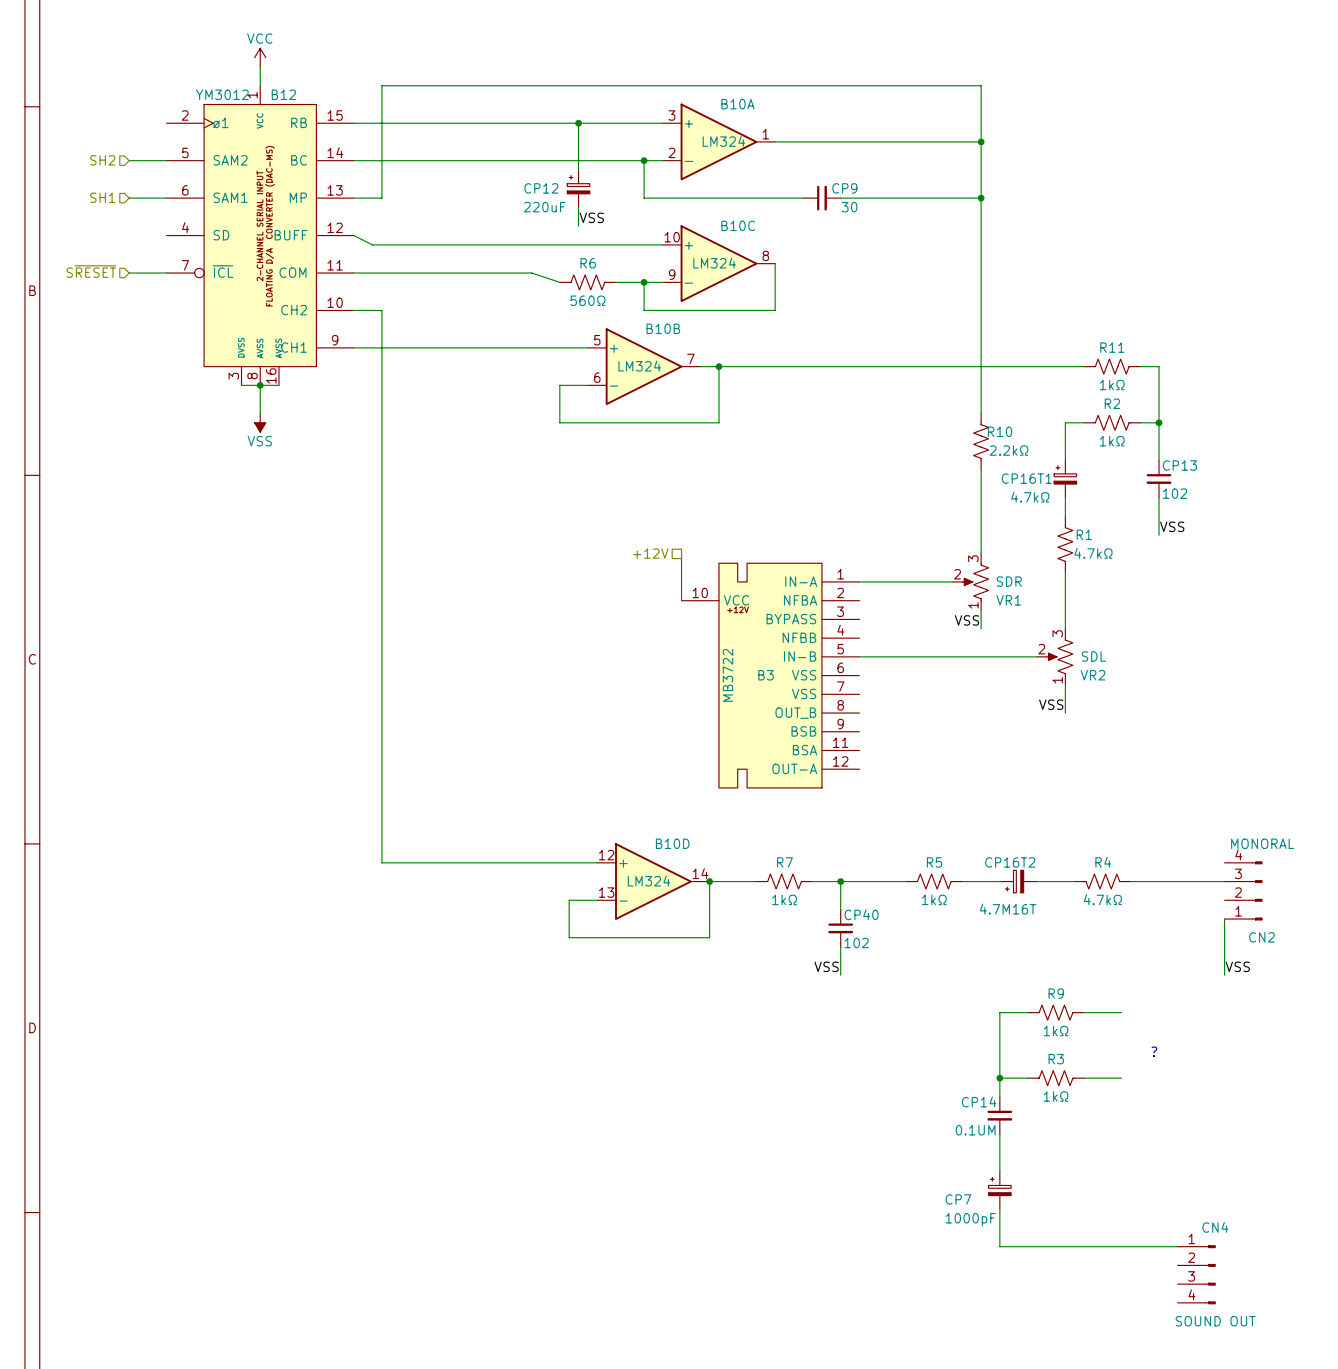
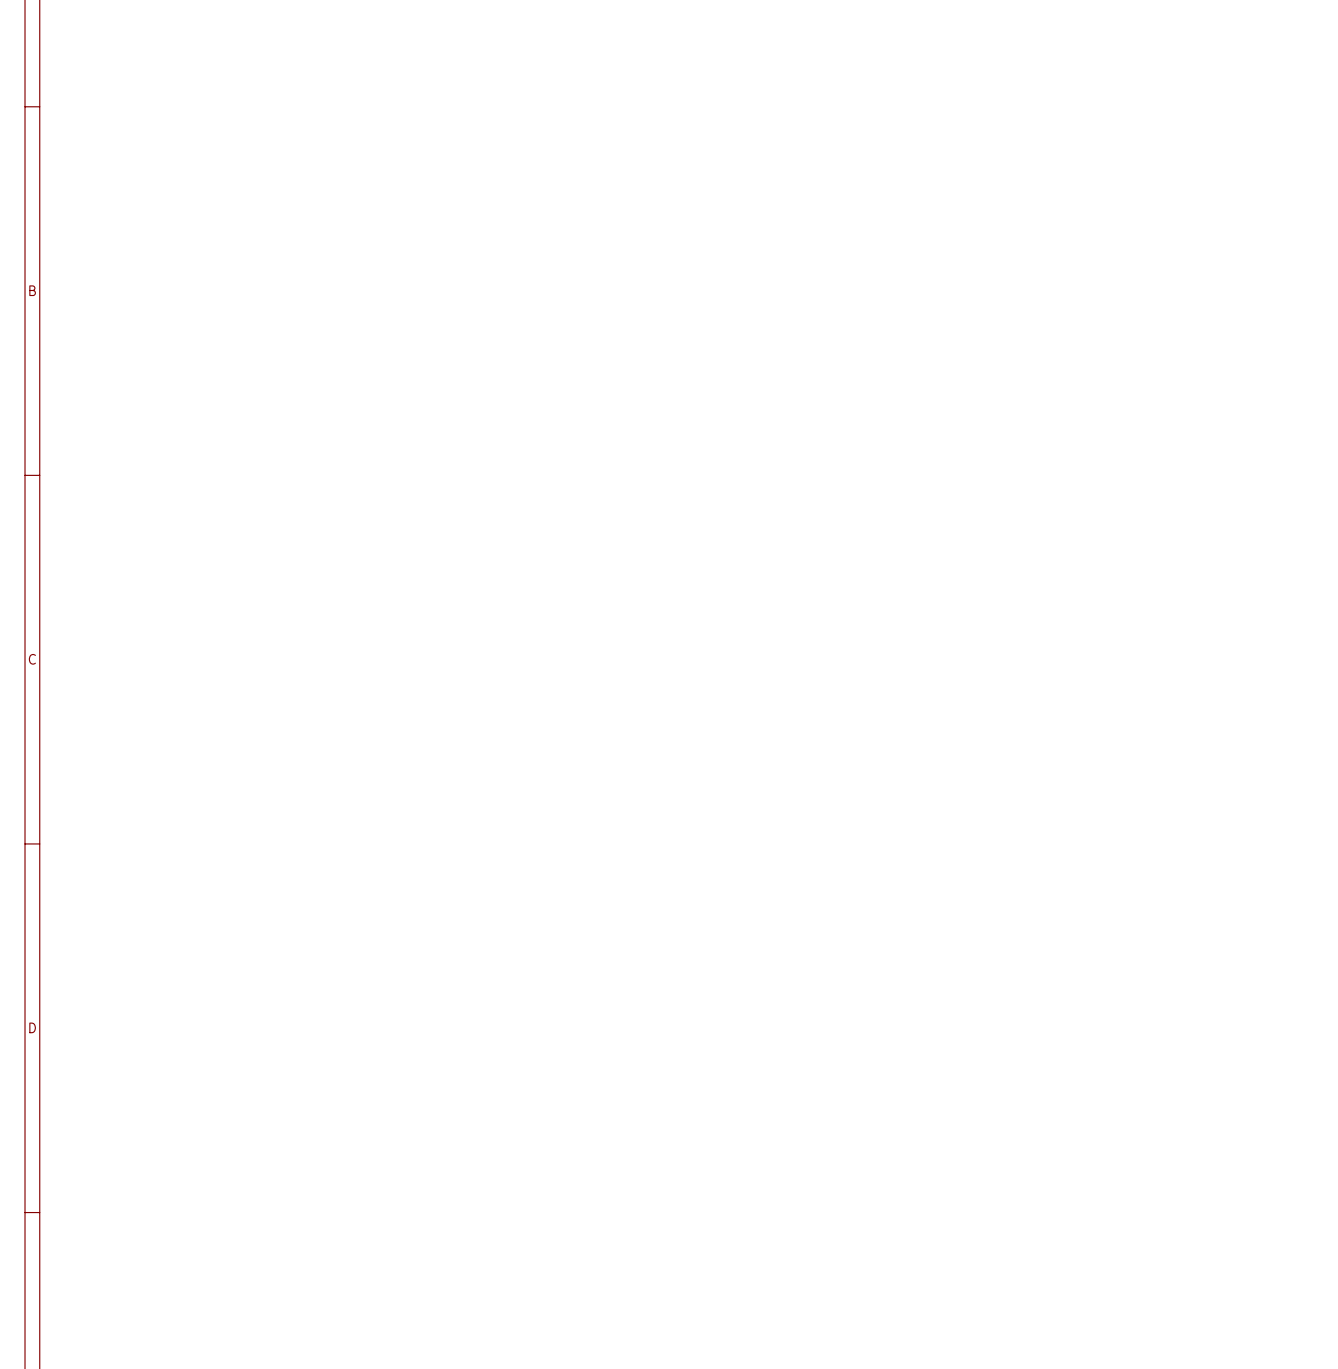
power symbol: VCC (260, 57) -> none
wire: (260, 67) (260, 85) -> none
wire: (353, 123) (662, 123) -> none
wire: (578, 123) (578, 170) -> none
junction: (578, 123) -> none
B10A: LM324 (718, 141) -> none
wire: (775, 141) (981, 141) -> none
junction: (981, 141) -> none
hierarchical label: SH2 (102, 160) -> none
wire: (129, 160) (166, 160) -> none
wire: (353, 160) (662, 160) -> none
wire: (644, 160) (644, 198) (803, 198) -> none
junction: (644, 160) -> none
CP12: 220uF (578, 188) -> none
hierarchical label: SH1 (102, 197) -> none
wire: (129, 198) (166, 198) -> none
wire: (353, 198) (381, 198) (381, 85) (981, 85) (981, 413) -> none
CP9: 30 (821, 198) -> none
wire: (840, 198) (981, 198) -> none
junction: (981, 198) -> none
wire: (578, 207) (578, 226) -> none
label: VSS (591, 217) -> none
B12: YM3012 (260, 235) -> none
wire: (353, 235) (372, 244) (662, 244) -> none
B10C: LM324 (718, 263) -> none
wire: (775, 263) (775, 310) (644, 310) (644, 282) -> none
hierarchical label: S~{RESET} (91, 271) -> none
wire: (129, 273) (166, 273) -> none
wire: (353, 273) (531, 273) (559, 282) -> none
R6: 560Ω (587, 282) -> none
wire: (616, 282) (662, 282) -> none
junction: (644, 282) -> none
wire: (353, 310) (381, 310) (381, 862) (597, 862) -> none
wire: (353, 347) (587, 347) -> none
B10B: LM324 (644, 366) -> none
wire: (700, 366) (1084, 366) -> none
wire: (718, 366) (718, 422) (559, 422) (559, 385) (587, 385) -> none
junction: (718, 366) -> none
R11: 1kΩ (1112, 366) -> none
wire: (1140, 366) (1159, 366) (1159, 460) -> none
wire: (241, 385) (278, 385) -> none
wire: (260, 385) (260, 413) -> none
junction: (260, 385) -> none
power symbol: VSS (260, 422) -> none
wire: (1084, 422) (1065, 422) (1065, 460) -> none
R2: 1kΩ (1112, 422) -> none
wire: (1140, 422) (1159, 422) -> none
junction: (1159, 422) -> none
R10: 2.2kΩ (981, 441) -> none
wire: (981, 469) (981, 553) -> none
CP16T1: 4.7kΩ (1065, 478) -> none
CP13: 102 (1159, 478) -> none
wire: (1065, 497) (1065, 516) -> none
wire: (1159, 497) (1159, 535) -> none
label: VSS (1172, 526) -> none
R1: 4.7kΩ (1065, 544) -> none
hierarchical label: +12V (650, 553) -> none
wire: (681, 553) (681, 600) -> none
wire: (1065, 572) (1065, 628) -> none
wire: (859, 581) (953, 581) -> none
SDR: VR1 (970, 581) -> none
wire: (981, 610) (981, 628) -> none
label: VSS (967, 620) -> none
wire: (859, 656) (1037, 656) -> none
SDL: VR2 (1055, 656) -> none
B3: MB3722 (770, 675) -> none
wire: (1065, 684) (1065, 713) -> none
label: VSS (1051, 704) -> none
B10D: LM324 (653, 881) -> none
junction: (709, 881) -> none
wire: (756, 881) (709, 881) (709, 937) (569, 937) (569, 900) (597, 900) -> none
R7: 1kΩ (784, 881) -> none
wire: (812, 881) (906, 881) -> none
wire: (840, 881) (840, 909) -> none
junction: (840, 881) -> none
R5: 1kΩ (934, 881) -> none
wire: (962, 881) (999, 881) -> none
CP16T2: 4.7M16T (1018, 881) -> none
wire: (1037, 881) (1074, 881) -> none
R4: 4.7kΩ (1102, 881) -> none
wire: (1130, 881) (1224, 881) -> none
CN2: MONORAL (1243, 890) -> none
wire: (1224, 919) (1224, 975) -> none
CP40: 102 (840, 928) -> none
wire: (840, 947) (840, 975) -> none
label: VSS (826, 966) -> none
label: VSS (1237, 966) -> none
wire: (1027, 1012) (999, 1012) (999, 1096) -> none
R9: 1kΩ (1056, 1012) -> none
wire: (1084, 1012) (1121, 1012) -> none
text: ? (1154, 1051) -> none
wire: (999, 1078) (1027, 1078) -> none
junction: (999, 1078) -> none
R3: 1kΩ (1056, 1078) -> none
wire: (1084, 1078) (1121, 1078) -> none
CP14: 0.1UM (999, 1115) -> none
wire: (999, 1134) (999, 1171) -> none
CP7: 1000pF (999, 1190) -> none
wire: (999, 1209) (999, 1246) (1177, 1246) -> none
CN4: SOUND OUT (1196, 1274) -> none

